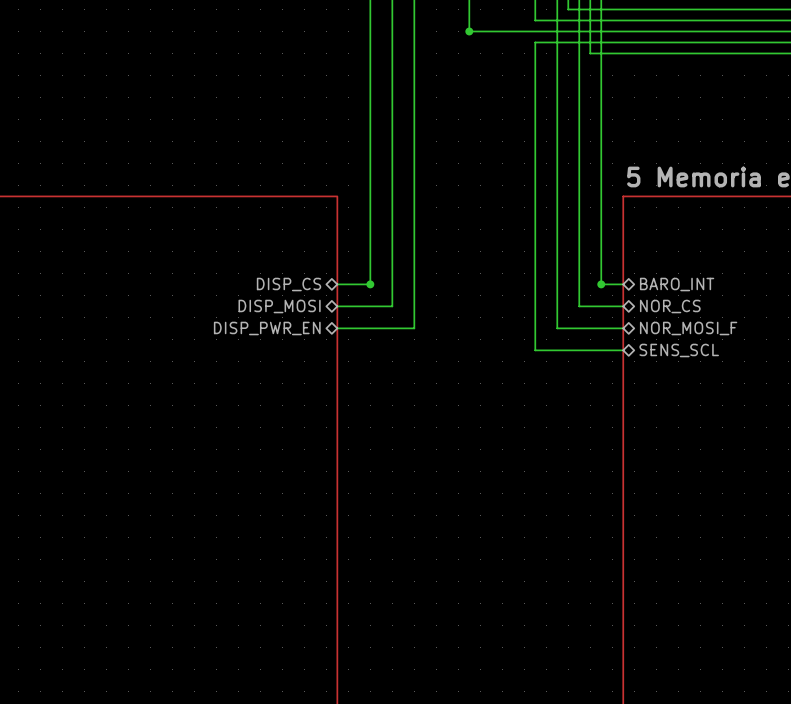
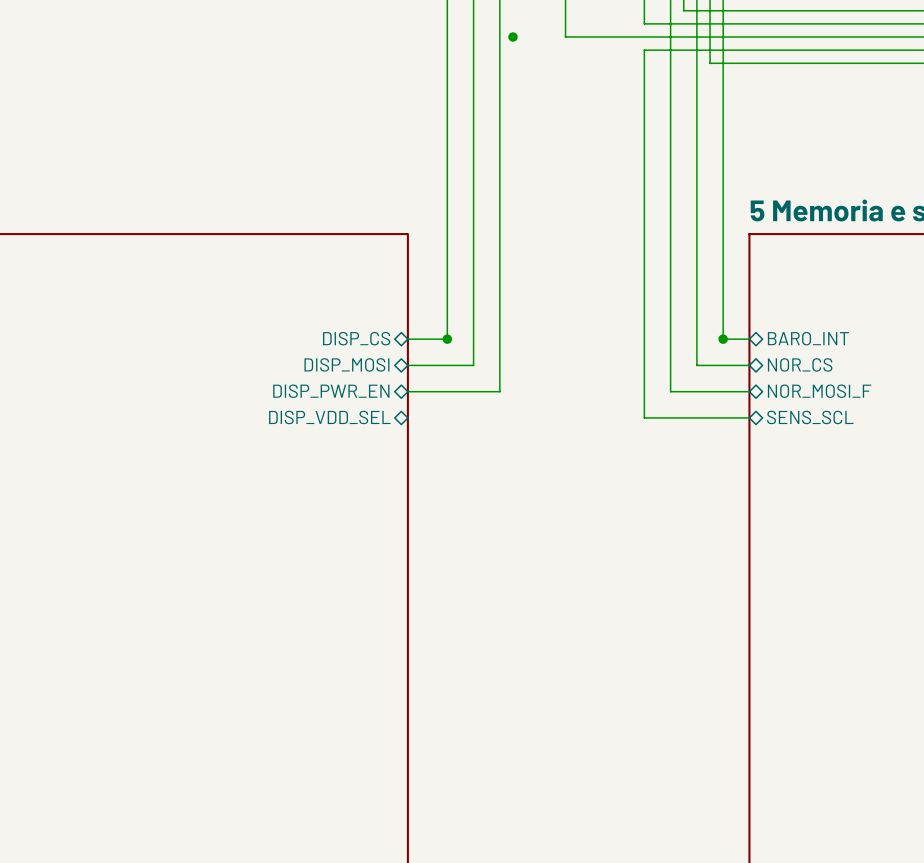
junction position: (469, 31) -> (512, 37)
sheet pin: none -> DISP_VDD_SEL (329, 417)

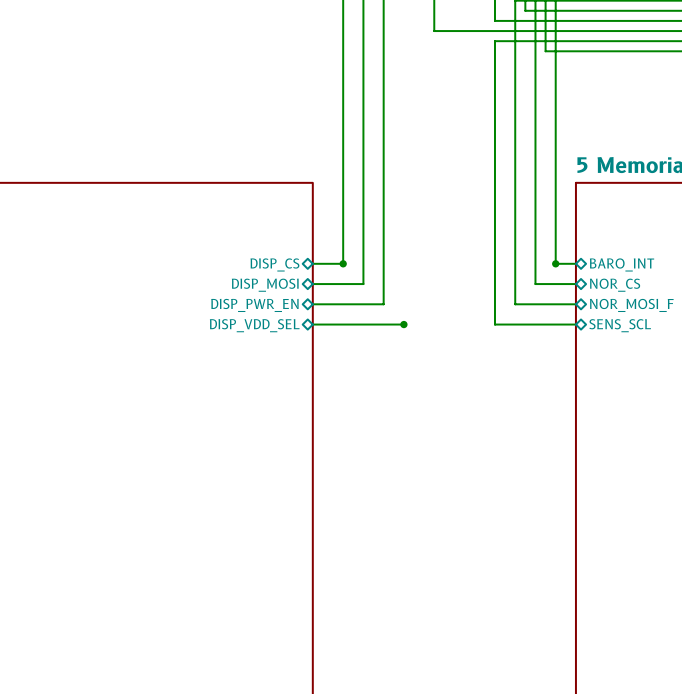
junction: (512, 37) -> none
wire: none -> (312, 324) (403, 324)
junction: none -> (403, 324)

